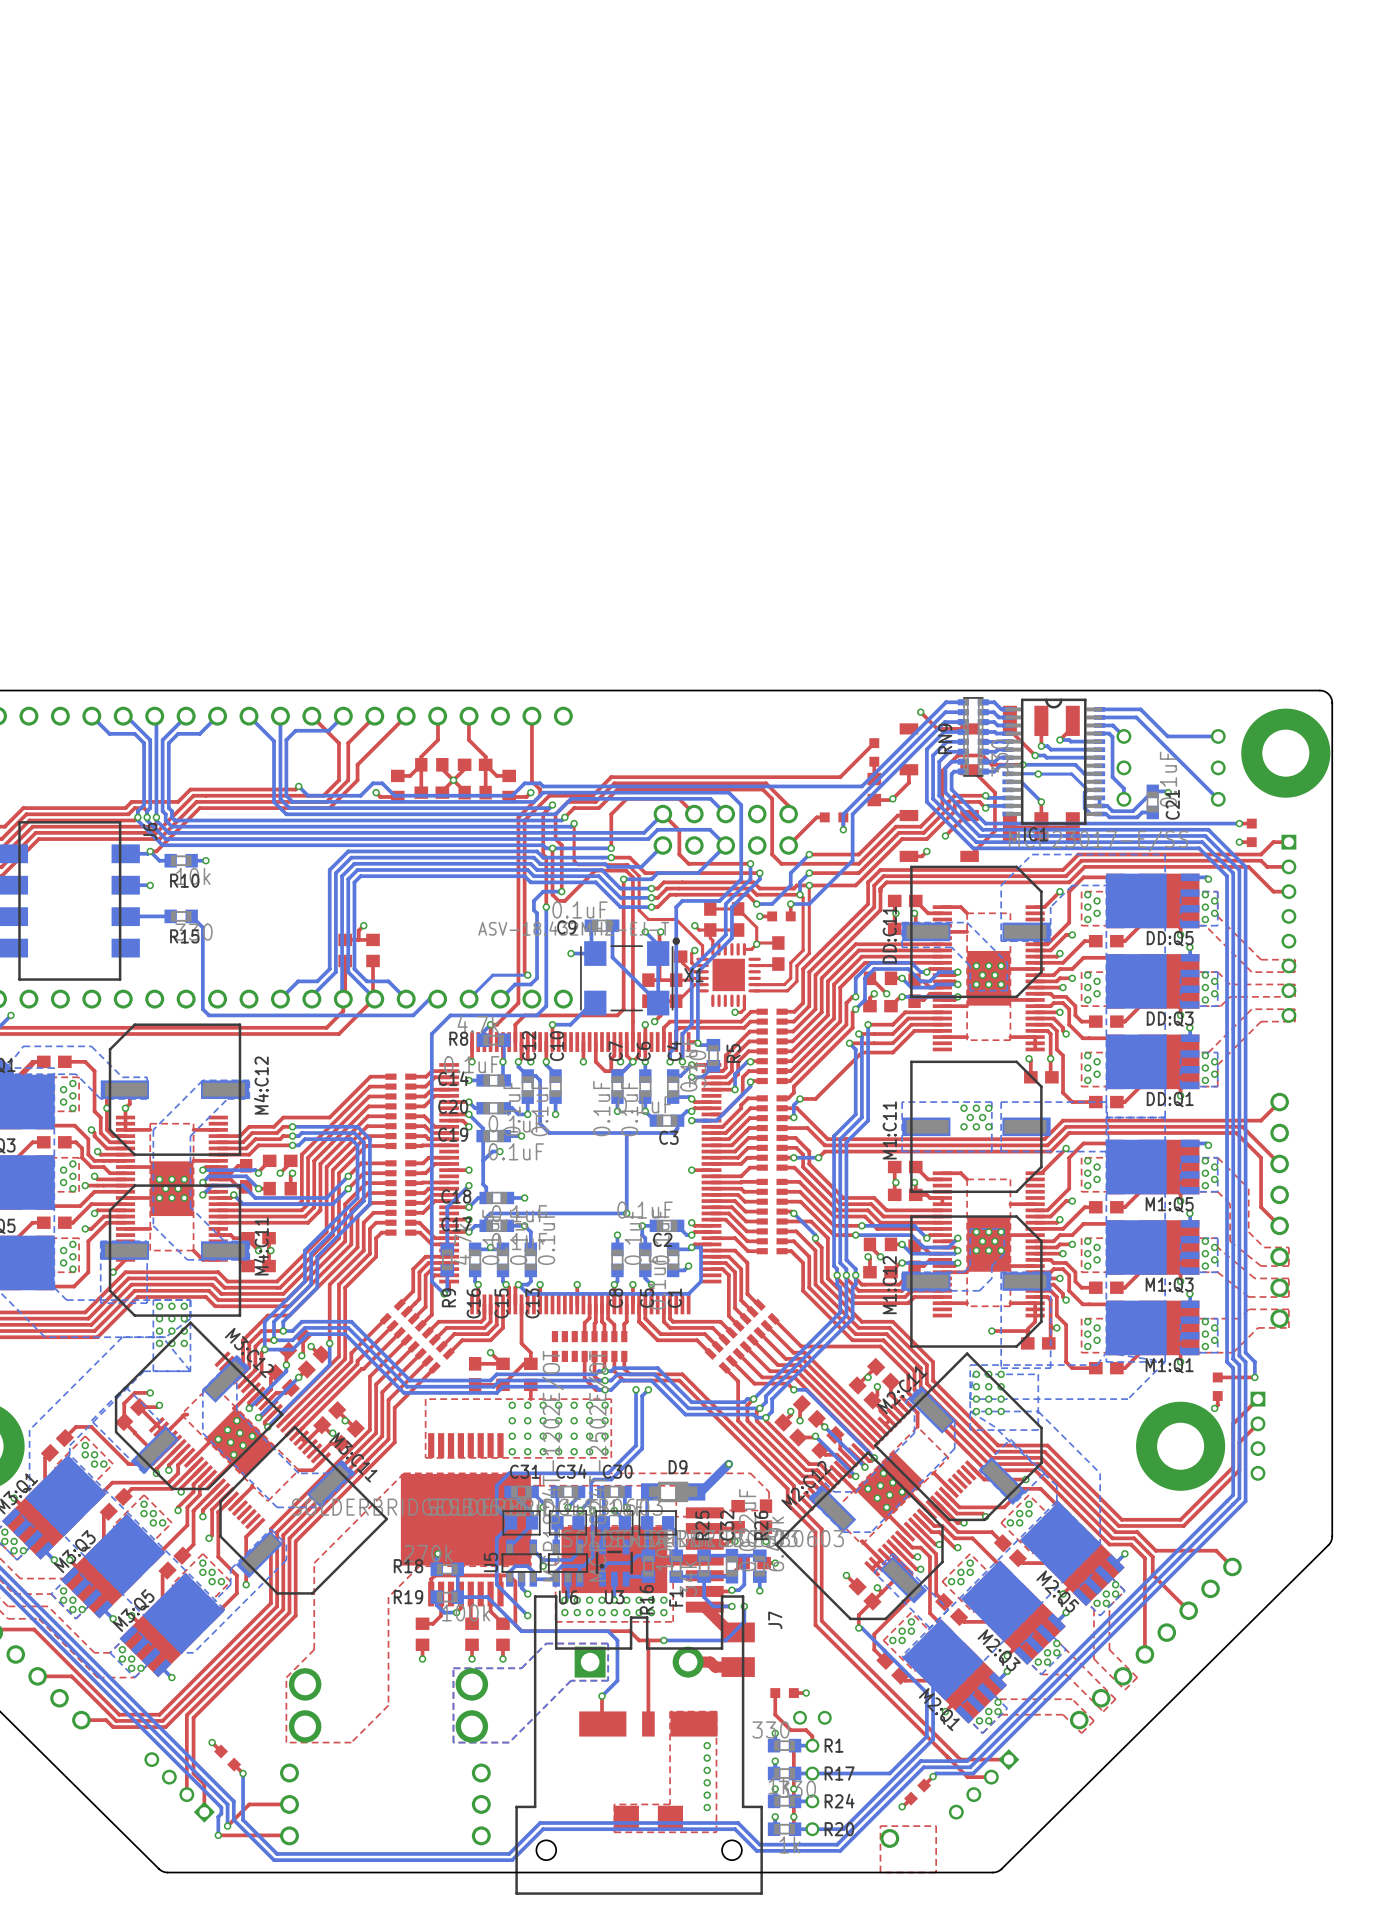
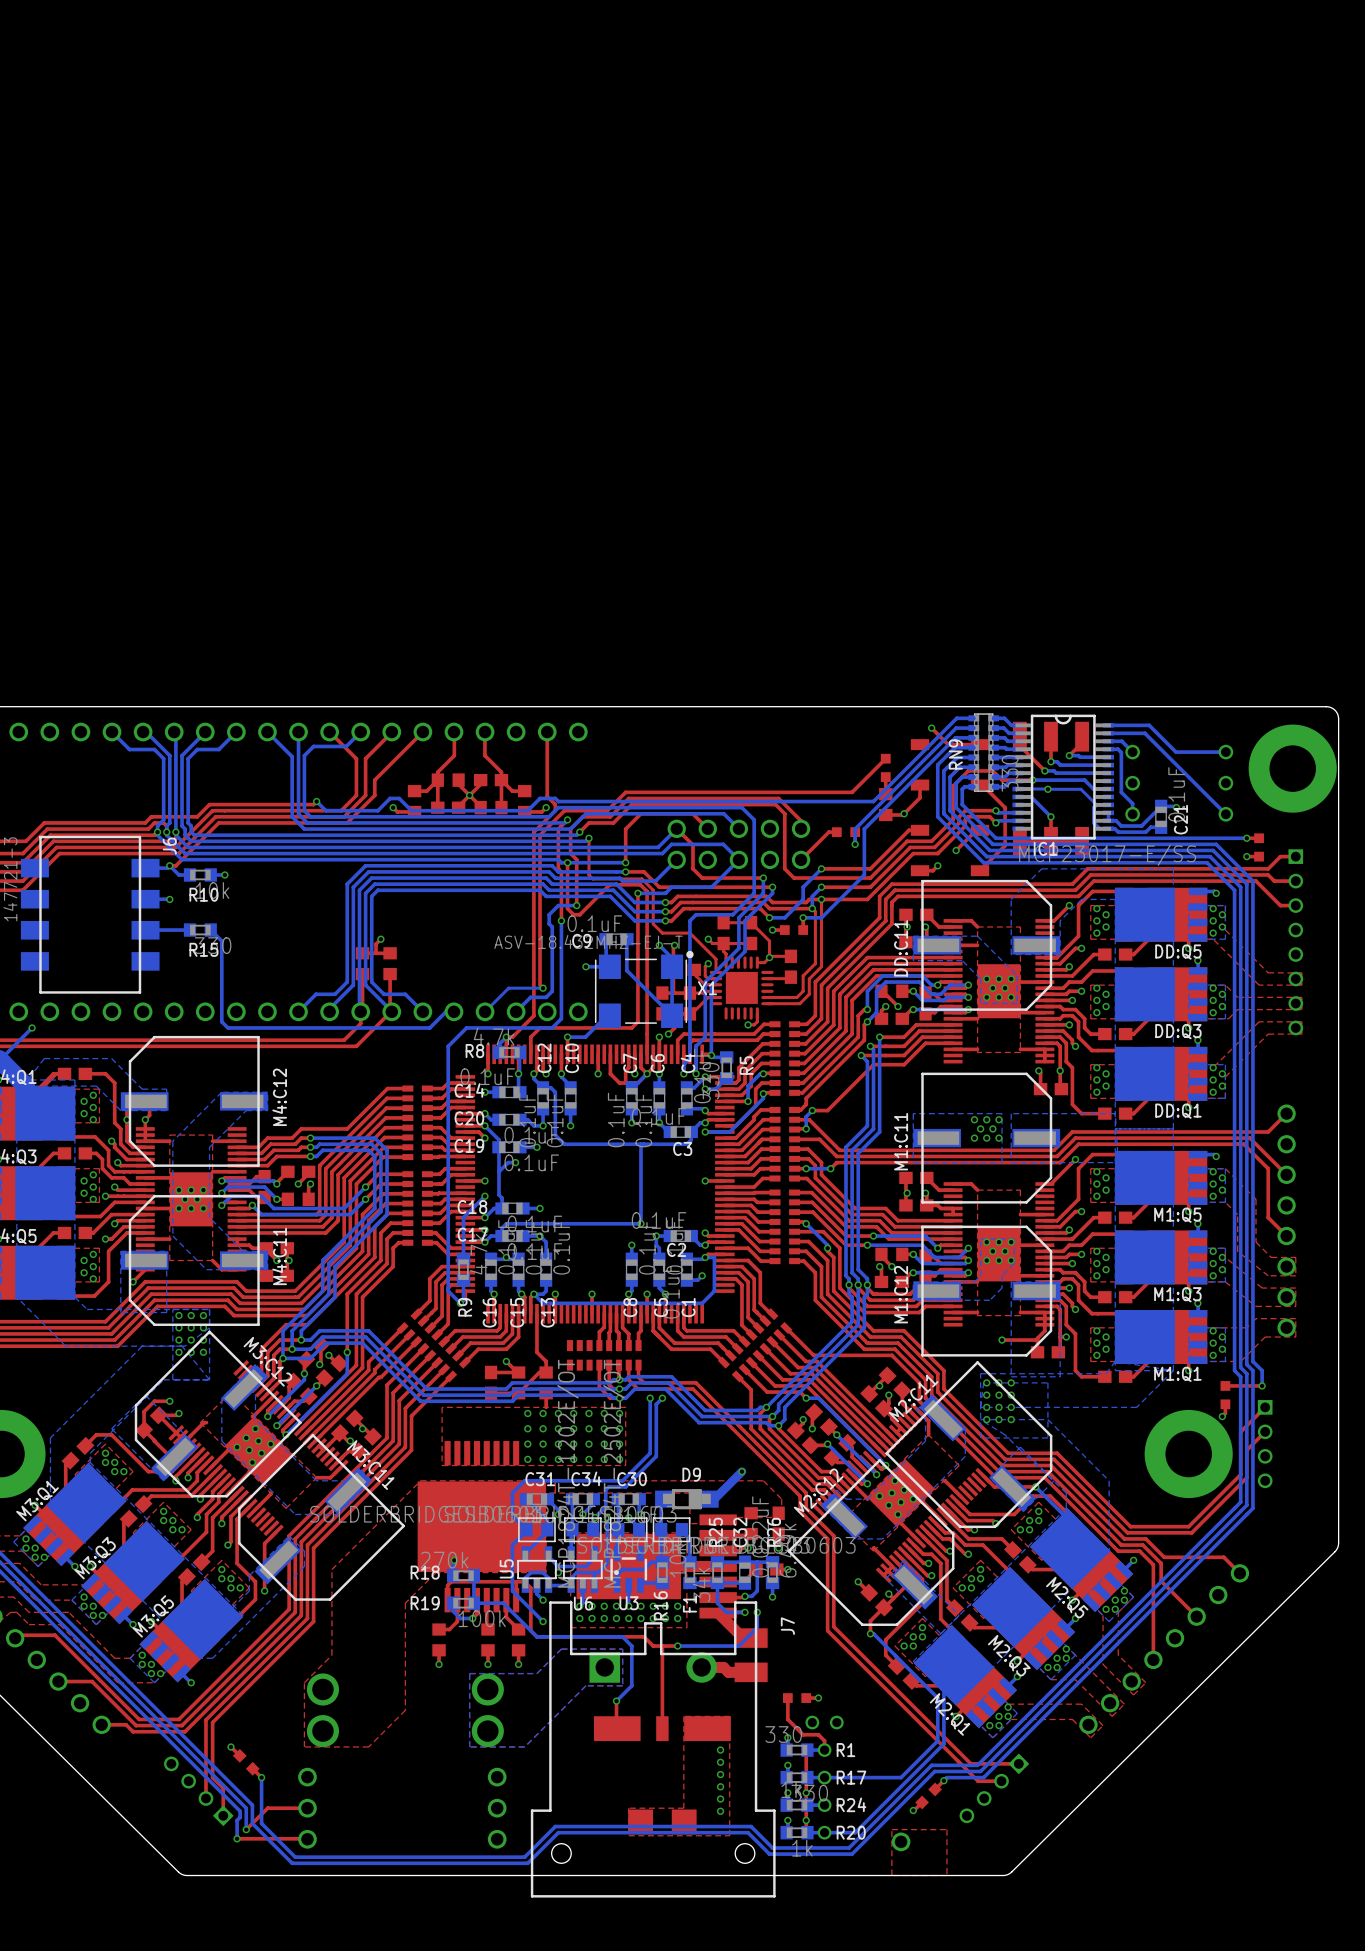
bottom track: none -> (1035, 1486) (1063, 1514)

